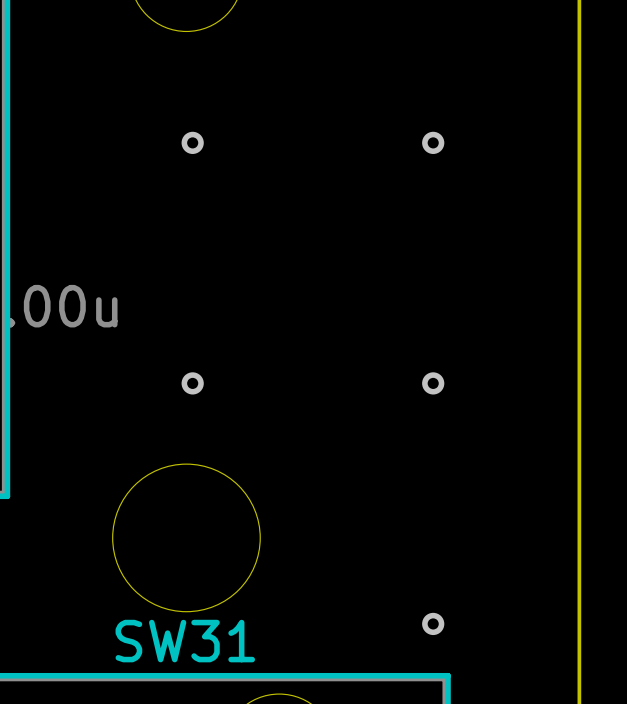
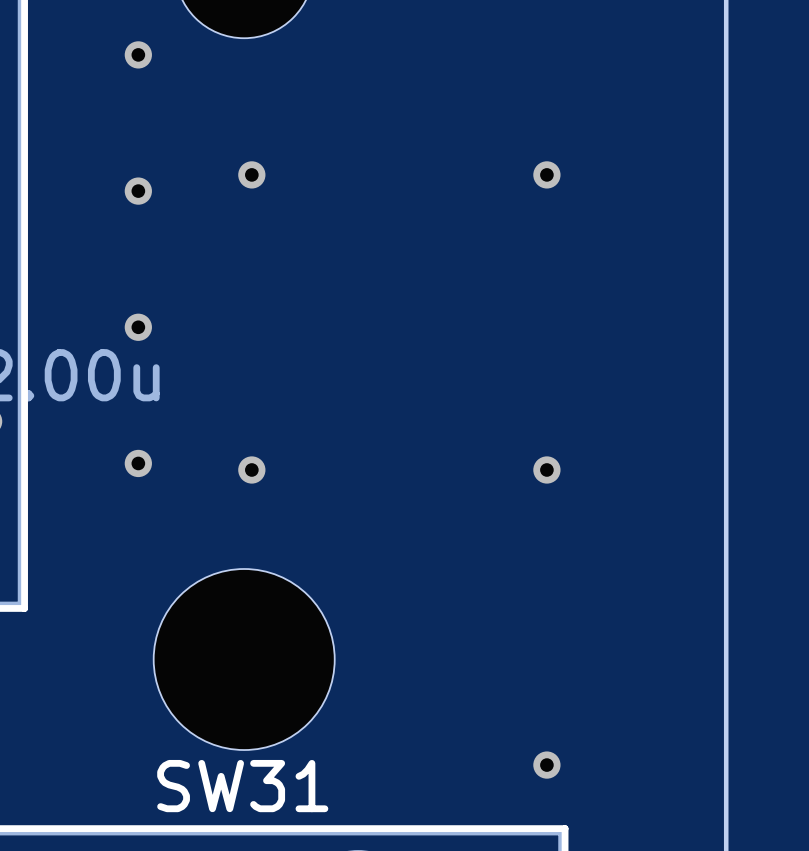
via: none -> (138, 54)
via: none -> (138, 191)
via: none -> (138, 327)
via: none -> (138, 463)

